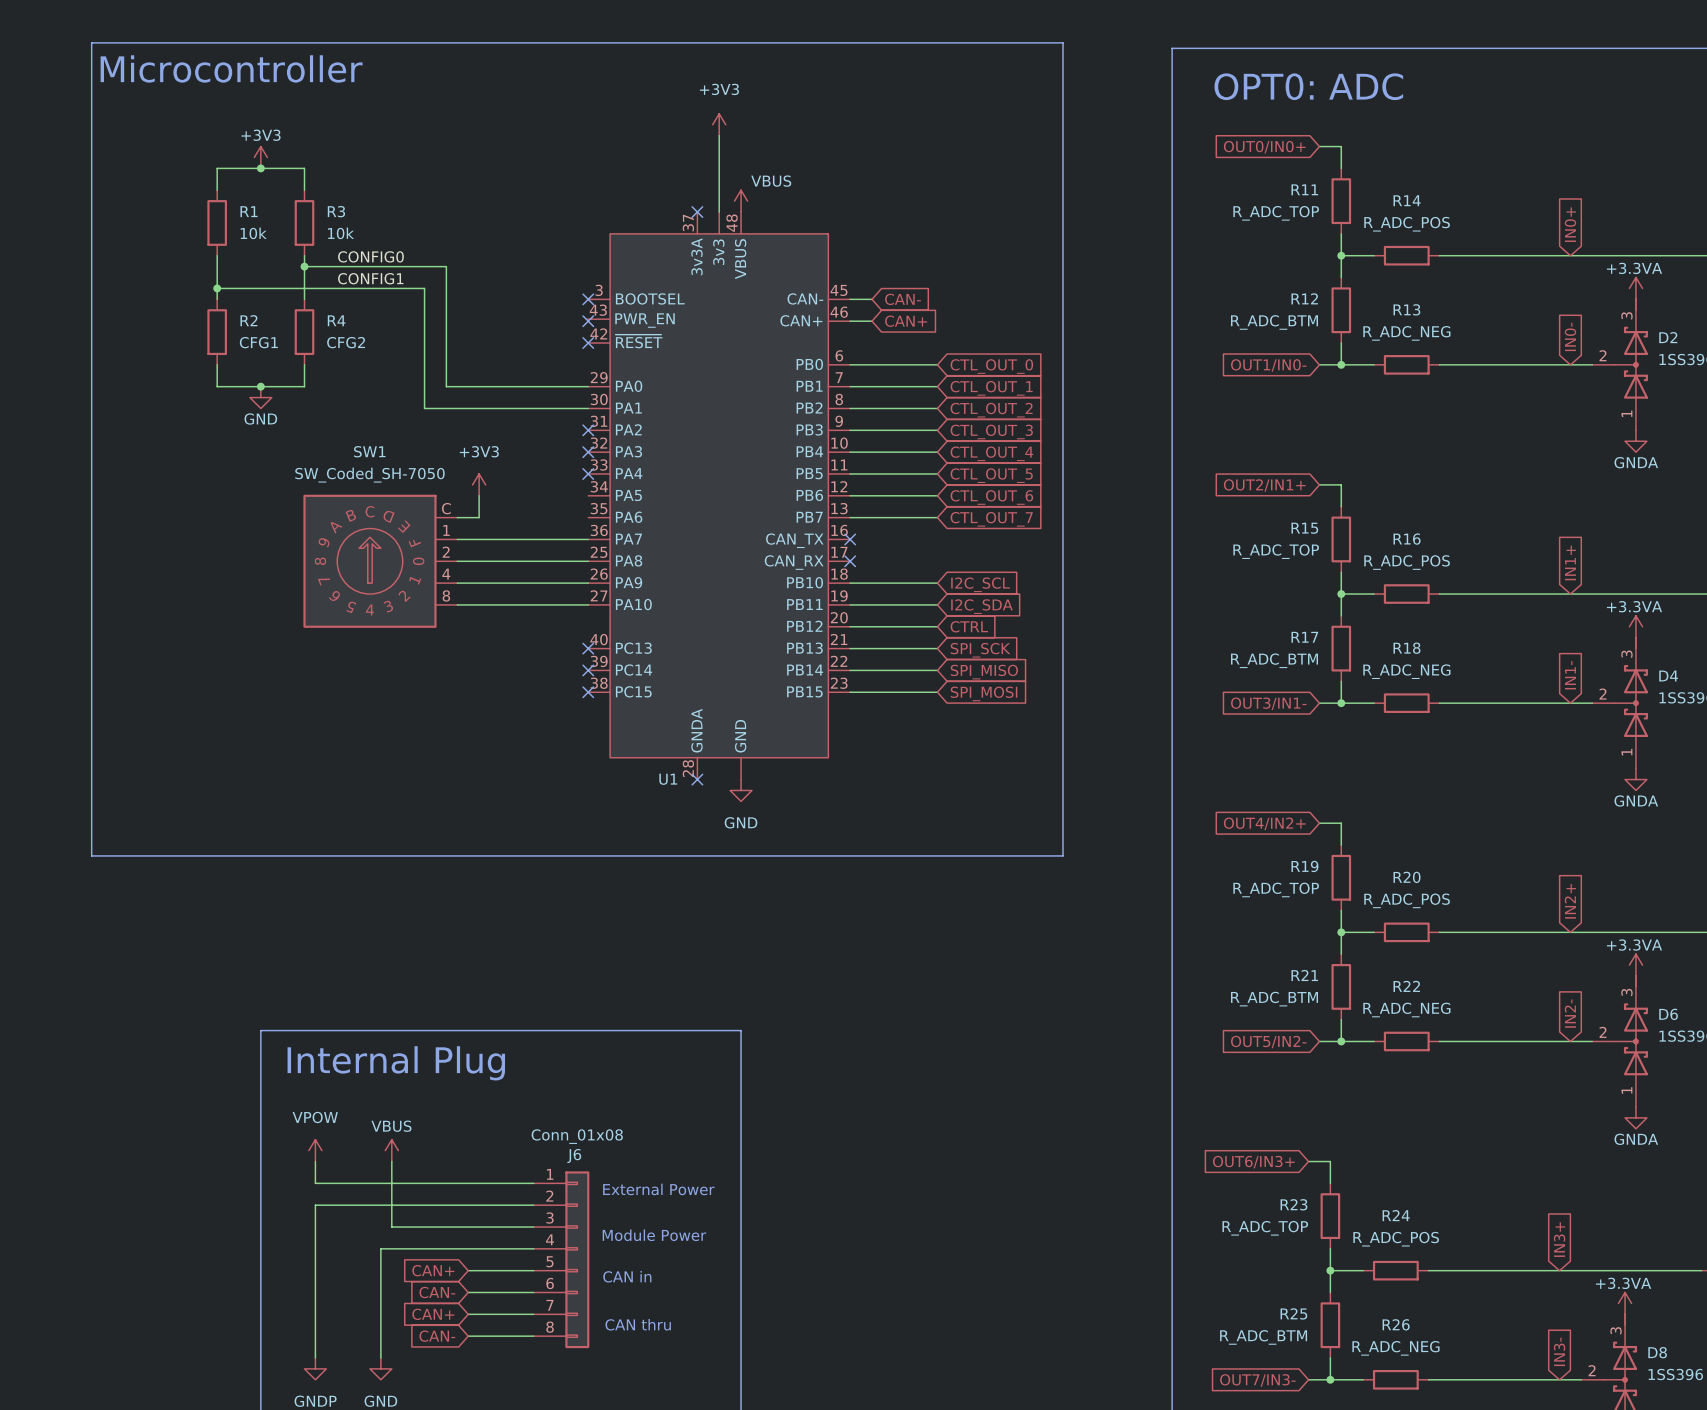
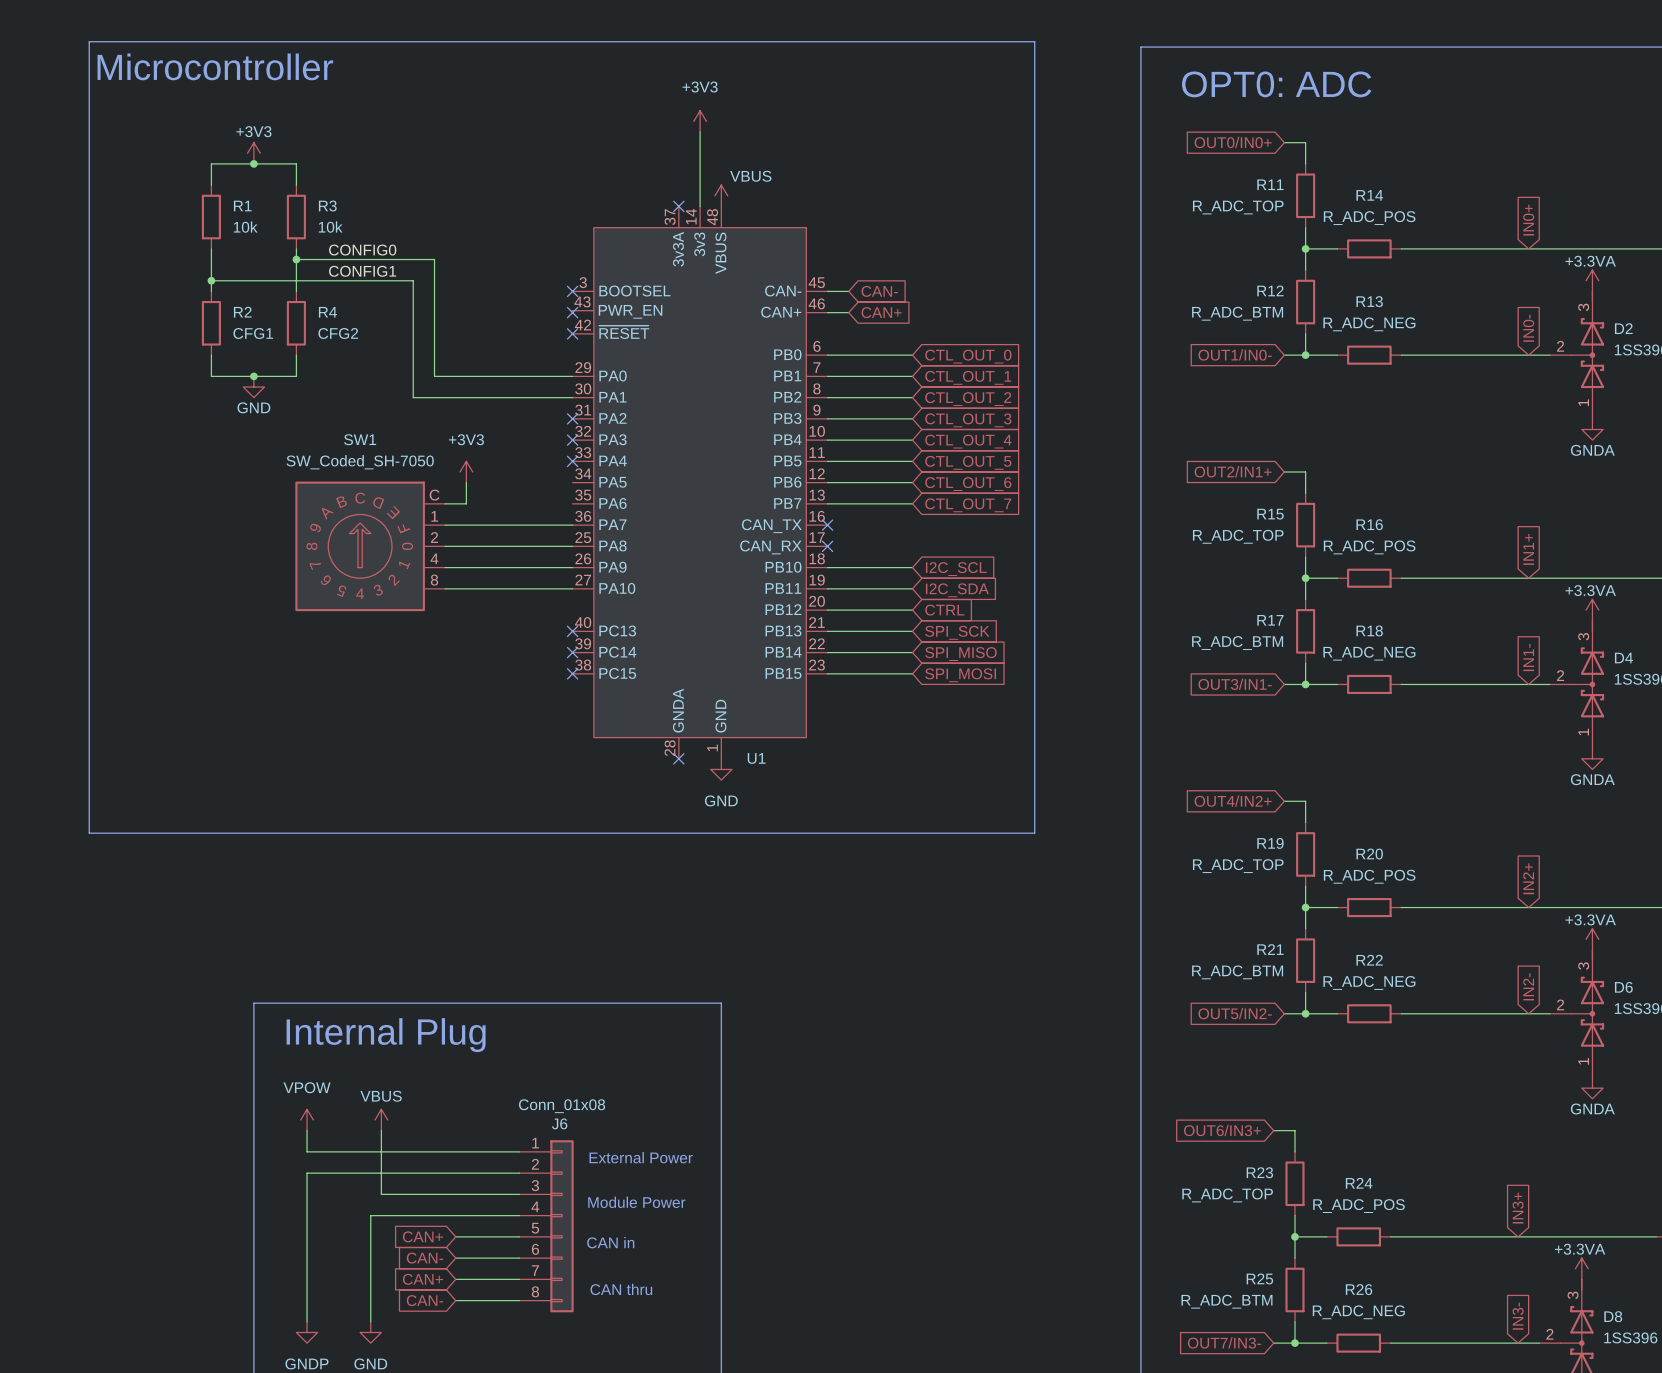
U1 pin number: none -> 14 (691, 216)
U1 pin number: none -> 1 (712, 747)
U1 name position: U1 (668, 779) -> U1 (756, 758)

